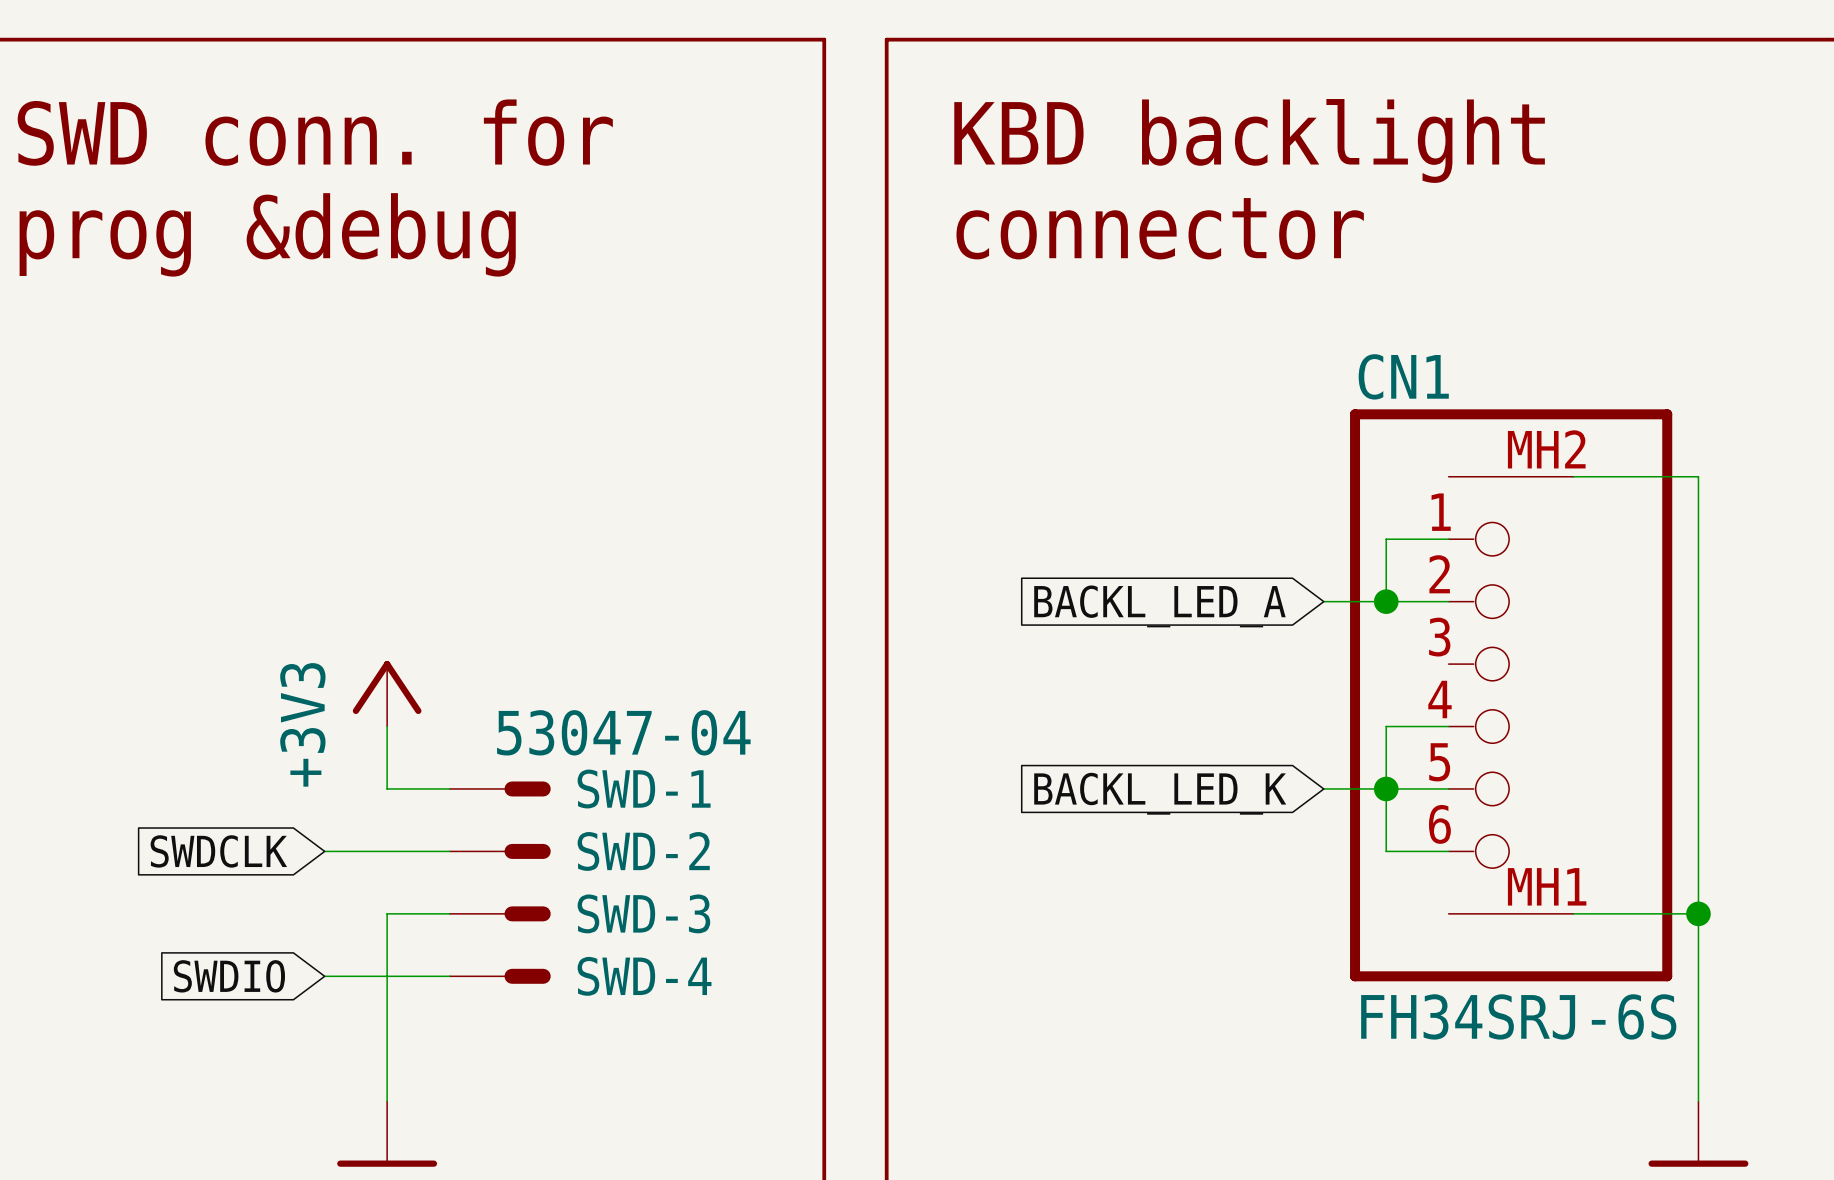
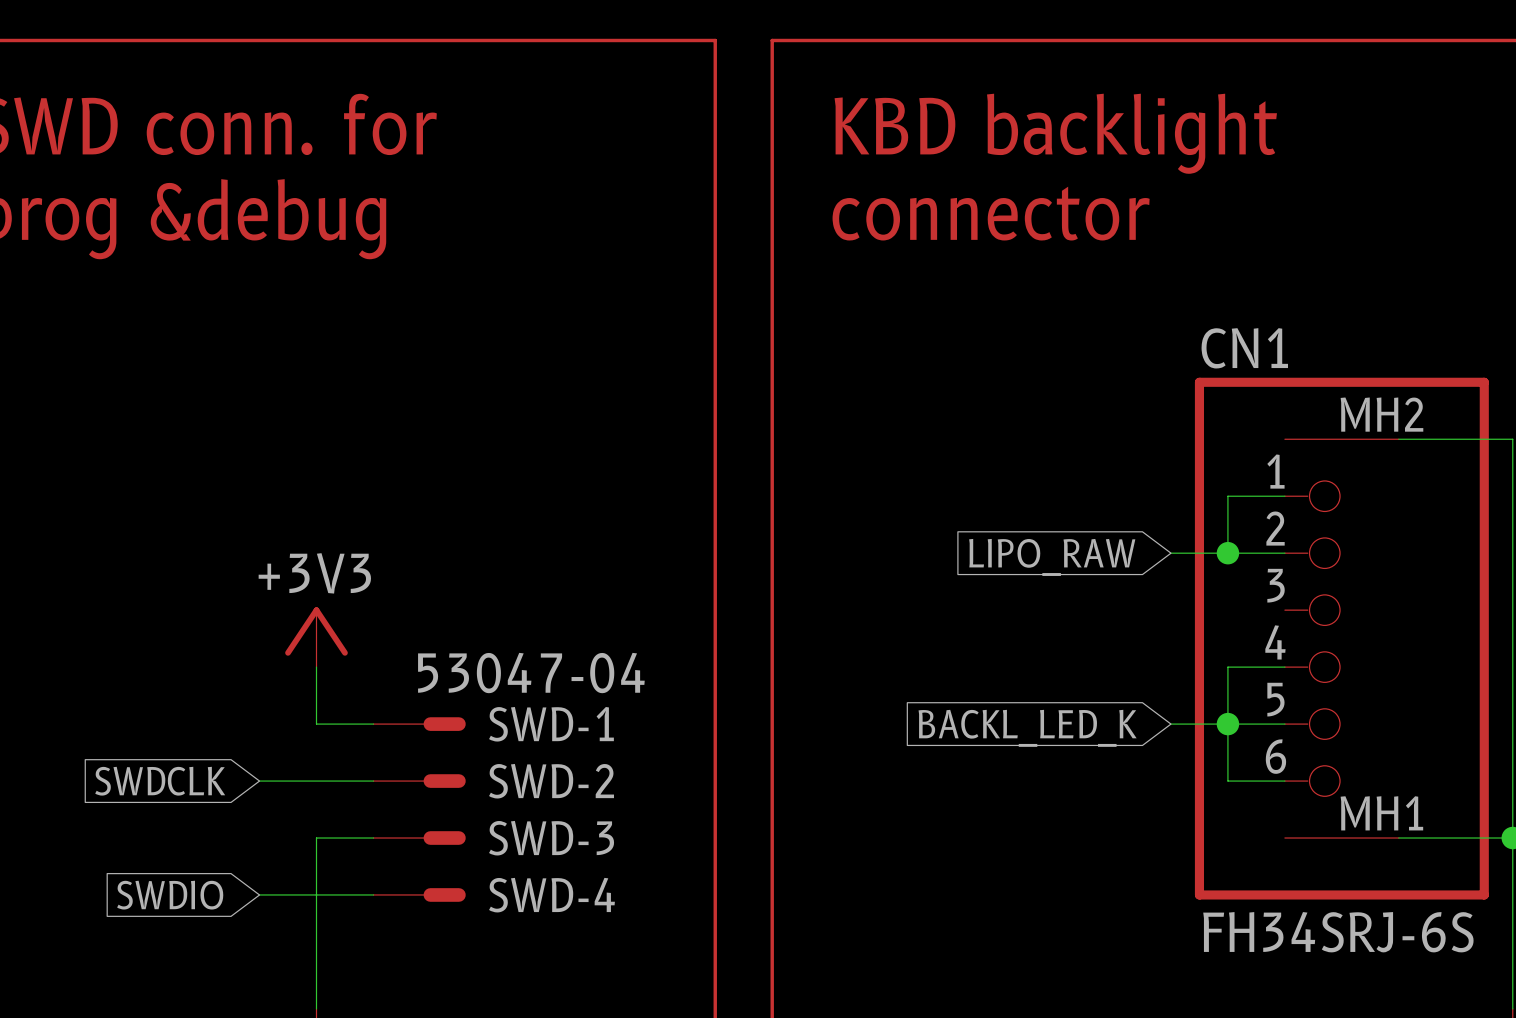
global label: BACKL_LED_A (1159, 606) -> LIPO_RAW (1052, 557)
power symbol text rotation: 0° (302, 724) -> 90° clockwise (314, 573)

